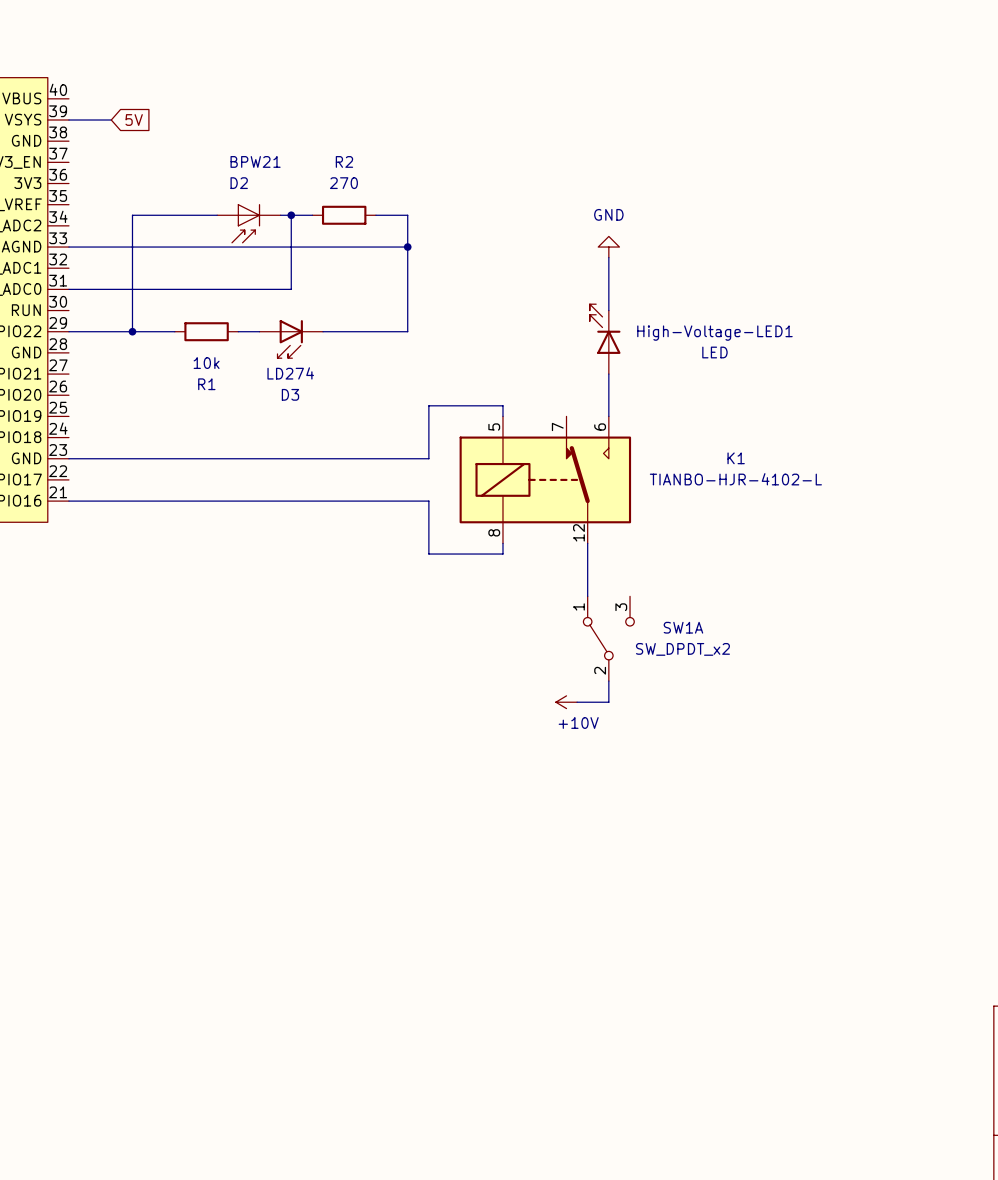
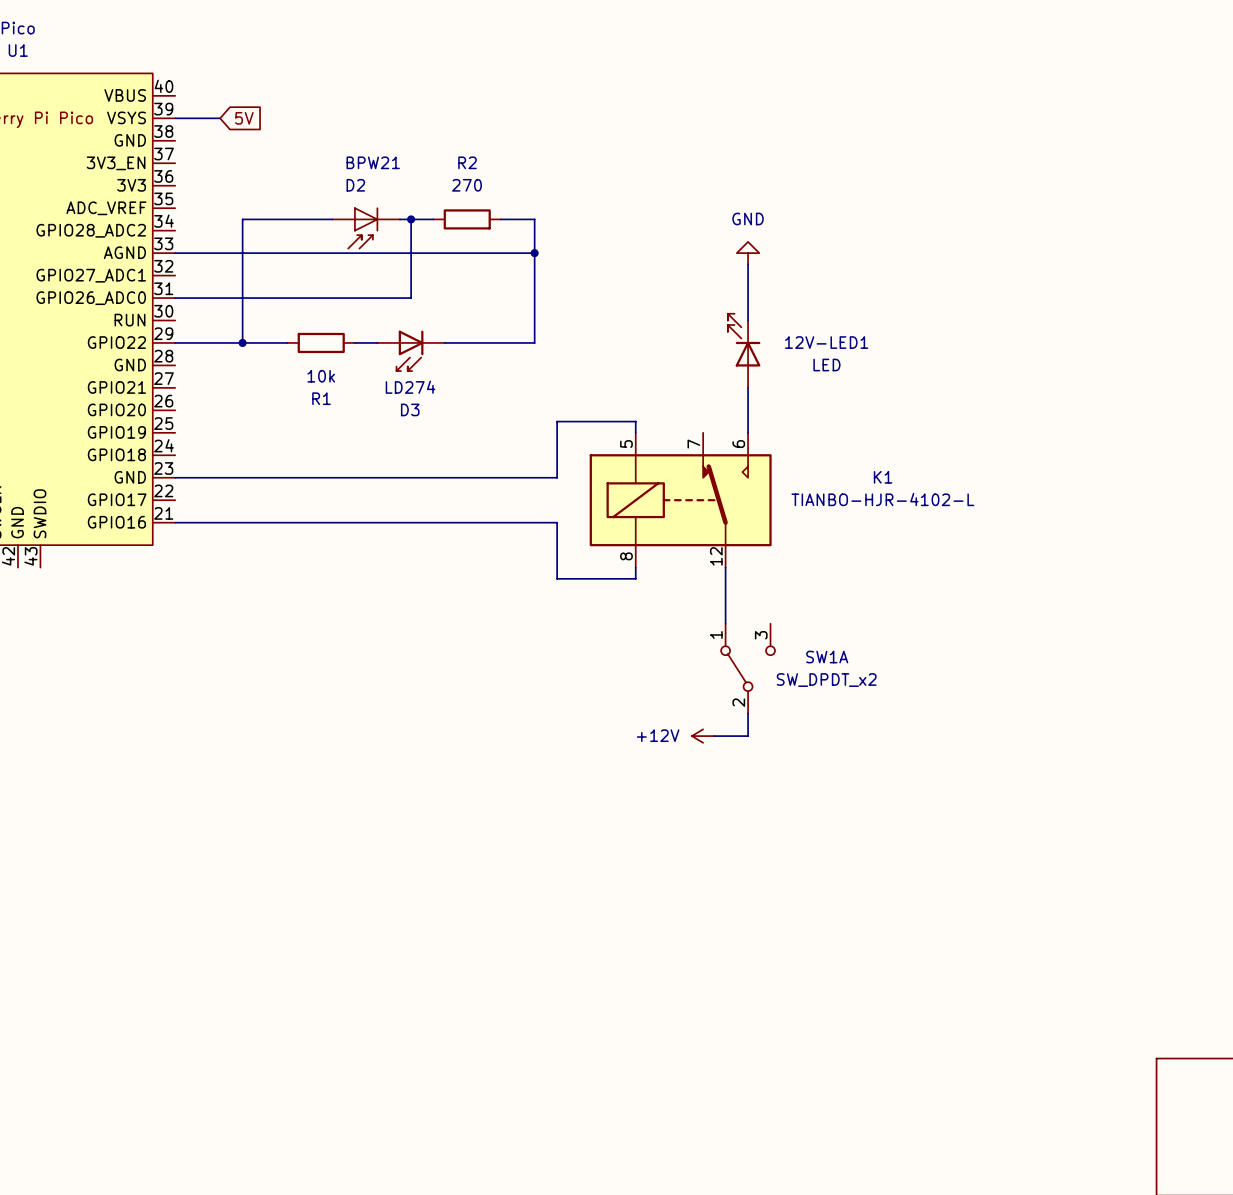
High-Voltage-LED1 name: High-Voltage-LED1 (714, 333) -> 12V-LED1 (826, 342)
High-Voltage-LED1 value position: LED (714, 352) -> LED (826, 365)
power symbol: +10V (566, 702) -> +12V (703, 736)

